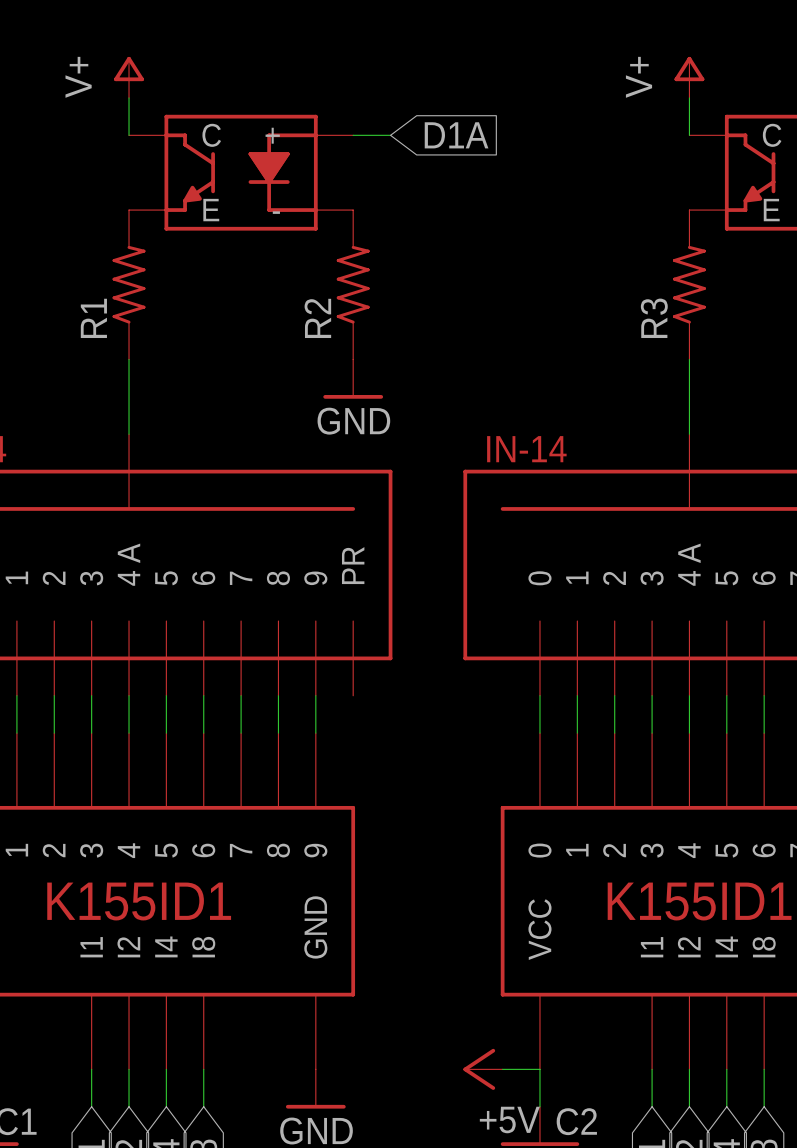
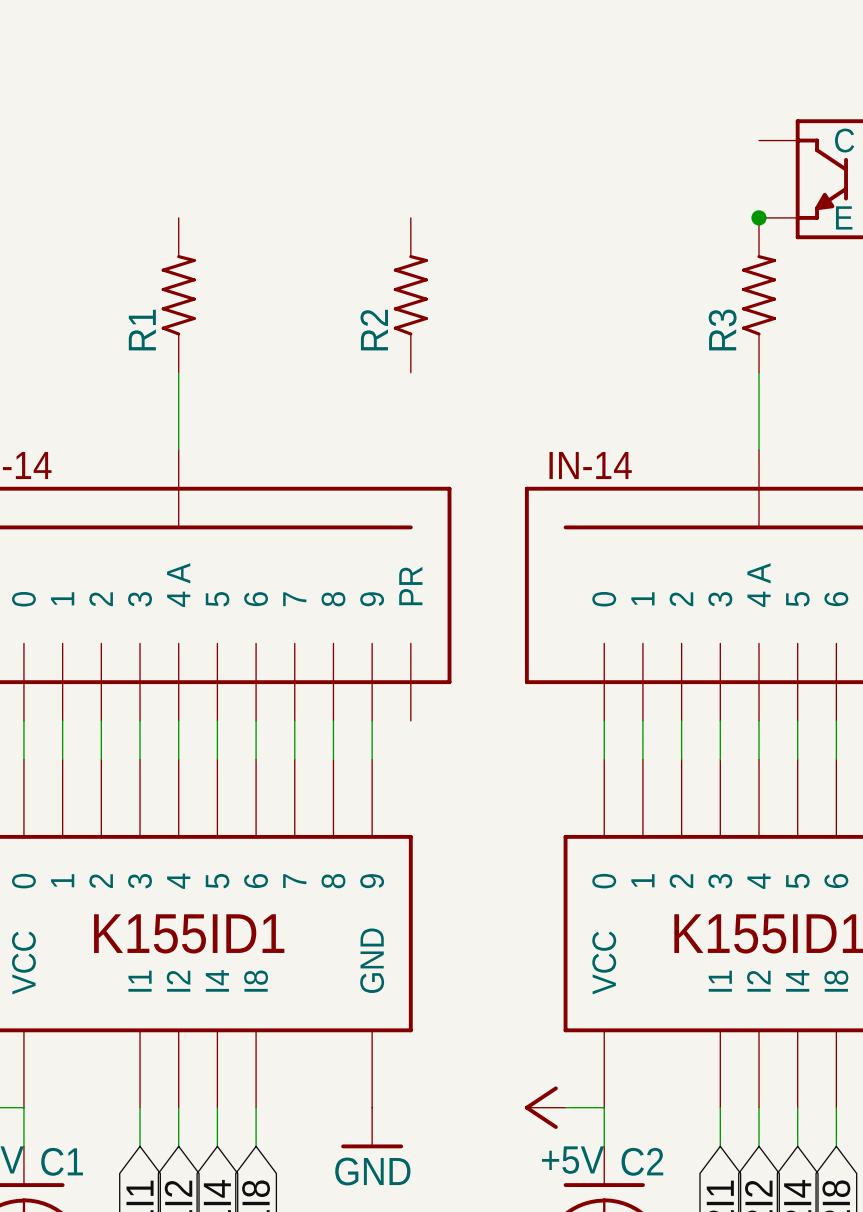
power symbol: V+ (129, 77) -> none
power symbol: V+ (689, 77) -> none
wire: (129, 97) (129, 135) -> none
wire: (689, 97) (689, 135) -> none
wire: (353, 135) (390, 135) -> none
global label: D1A (456, 135) -> none
part: (241, 172) -> none
junction: none -> (758, 217)
power symbol: GND (353, 379) -> none

